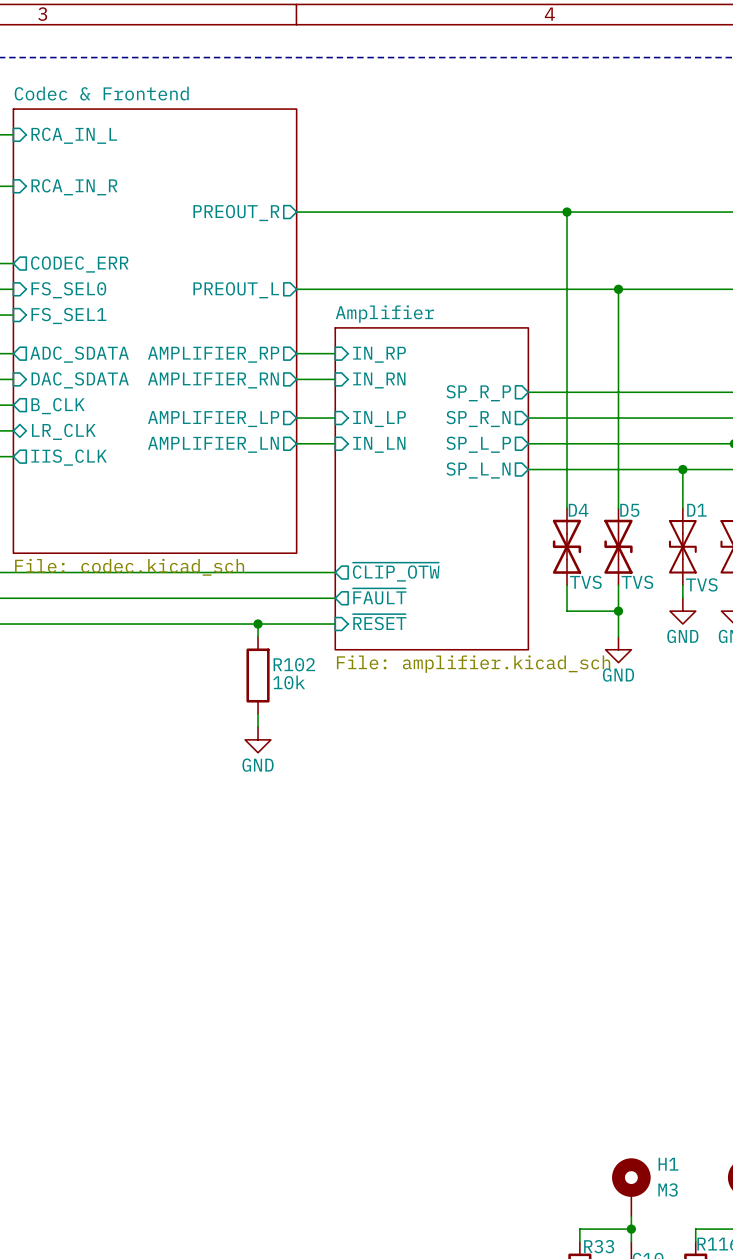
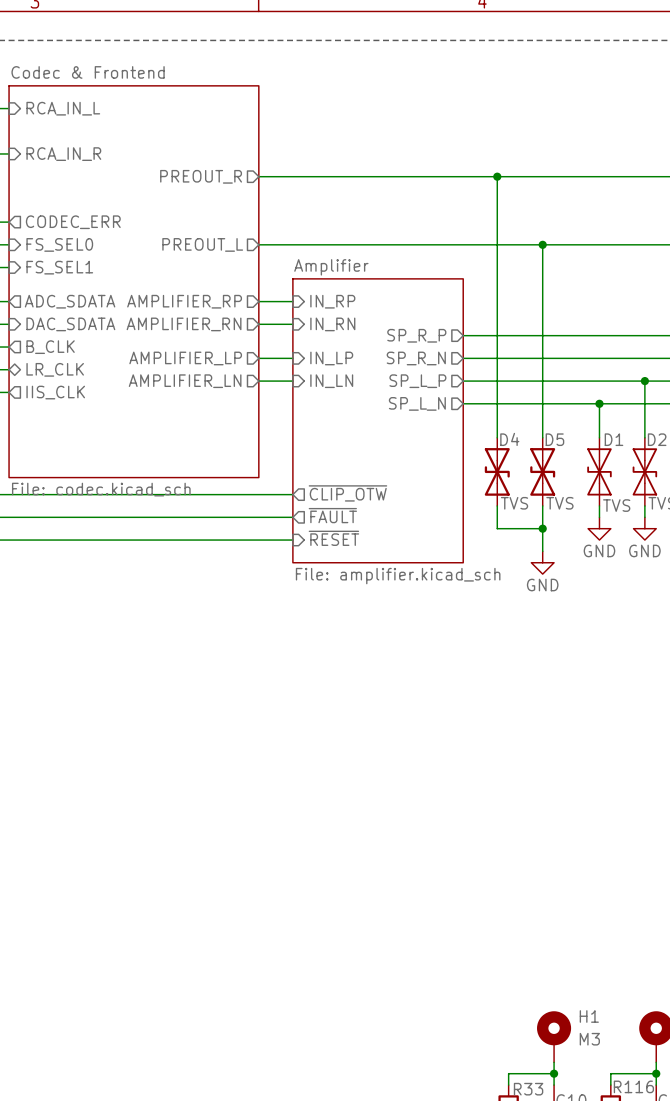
wire: (258, 624) (258, 636) -> none
junction: (258, 624) -> none
R102: 10k (258, 675) -> none
wire: (258, 714) (258, 727) -> none
power symbol: GND (258, 739) -> none

